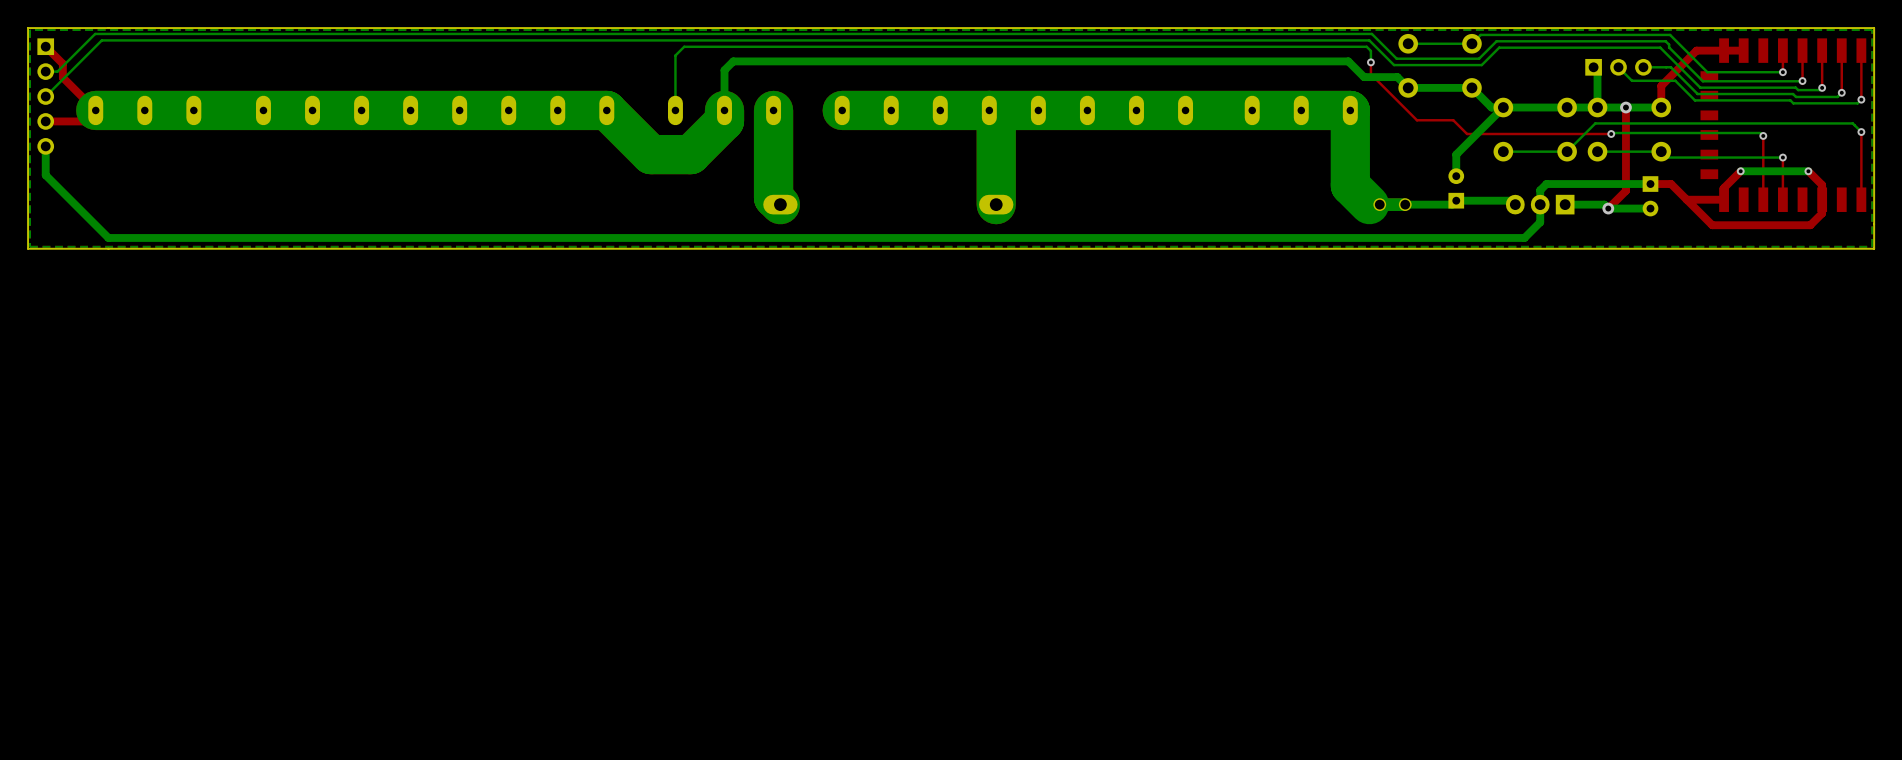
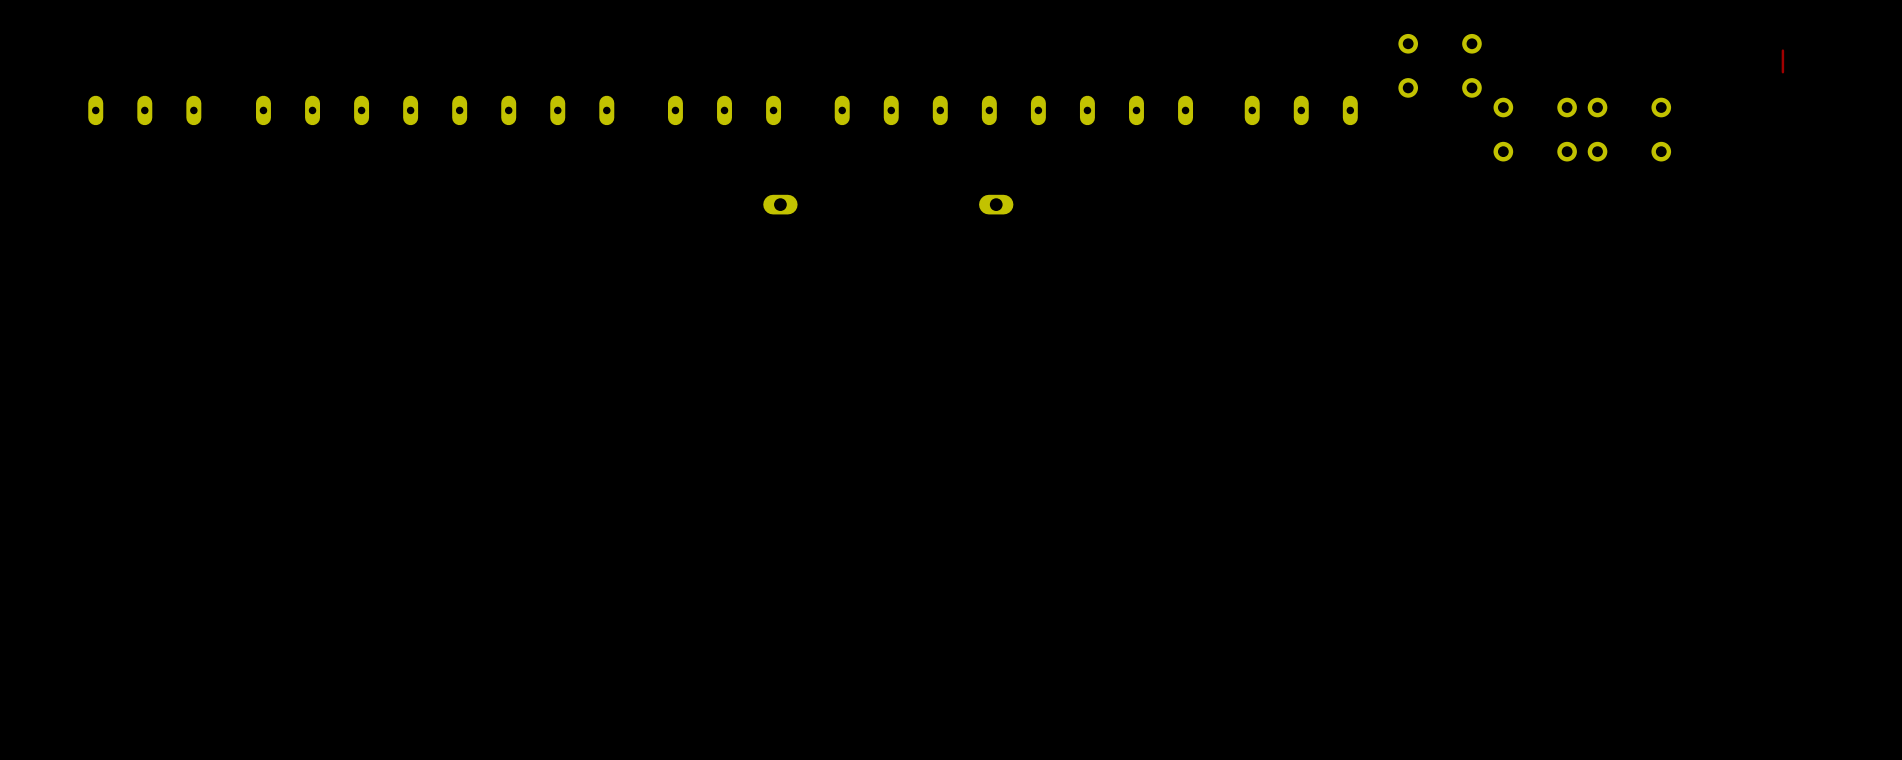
board edge: (1874, 28) (28, 28) (28, 248) (1874, 248) (1874, 28) -> none
bottom zone outline: (1872, 30) (1872, 246) (30, 246) (30, 30) (1872, 30) -> none
bottom track: (1408, 43) (1471, 43) (1480, 34) (1670, 34) (1707, 72) (1782, 72) -> none
top track: (45, 46) (62, 63) (62, 77) (95, 110) -> none
top track: (1743, 50) (1696, 50) (1661, 85) (1661, 107) -> none
top track: (1802, 50) (1802, 83) -> none
top track: (1822, 50) (1822, 87) -> none
top track: (1841, 50) (1841, 92) -> none
top track: (1861, 50) (1861, 99) -> none
top track: (1370, 62) (1370, 74) (1416, 120) (1453, 120) (1467, 134) (1611, 134) -> none
bottom track: (1370, 62) (1370, 51) (1366, 46) (684, 46) (675, 55) (675, 110) -> none
via: (1370, 62) -> none
bottom track: (1593, 67) (1597, 71) (1597, 107) -> none
bottom track: (1618, 67) (1632, 80) (1675, 80) (1694, 100) (1790, 100) (1793, 103) (1857, 103) (1861, 99) -> none
part: (1618, 67) -> none
bottom track: (1643, 67) (1670, 67) (1697, 94) (1793, 94) (1796, 96) (1837, 96) (1841, 92) -> none
bottom track: (45, 71) (57, 71) (95, 33) (1371, 33) (1396, 58) (1479, 58) (1496, 41) (1665, 41) (1669, 47) (1702, 81) (1802, 81) -> none
via: (1782, 72) -> none
via: (1802, 81) -> none
bottom track: (1822, 87) (1819, 90) (1798, 90) (1795, 87) (1700, 87) (1660, 47) (1499, 47) (1481, 65) (1394, 65) (1369, 40) (101, 40) (45, 96) -> none
via: (1822, 87) -> none
via: (1841, 92) -> none
part: (45, 96) -> none
via: (1861, 99) -> none
bottom track: (1503, 107) (1456, 154) (1456, 176) -> none
top track: (1625, 107) (1625, 190) (1608, 208) -> none
via: (1625, 107) -> none
bottom track: (1661, 107) (1491, 107) (1471, 87) (1408, 87) (1397, 77) (1364, 77) (1348, 61) (733, 61) (724, 70) (724, 120) (690, 154) (650, 154) (606, 110) (95, 110) -> none
top track: (95, 110) (84, 121) (45, 121) -> none
bottom track: (773, 110) (773, 197) (780, 204) -> none
bottom track: (842, 110) (1350, 110) (1350, 185) (1369, 204) -> none
bottom track: (989, 110) (996, 117) (996, 204) -> none
part: (1783, 125) -> none
top track: (1861, 132) (1861, 199) -> none
bottom track: (1861, 132) (1852, 123) (1595, 123) (1567, 151) (1503, 151) -> none
via: (1861, 132) -> none
bottom track: (1611, 134) (1760, 133) (1763, 135) -> none
via: (1611, 134) -> none
top track: (1763, 135) (1763, 199) -> none
via: (1763, 135) -> none
bottom track: (45, 146) (45, 175) (108, 237) (1524, 237) (1540, 222) (1540, 190) (1546, 184) (1650, 184) -> none
bottom track: (1597, 151) (1661, 151) (1667, 157) (1782, 157) -> none
top track: (1782, 157) (1782, 199) -> none
via: (1782, 157) -> none
top track: (1740, 171) (1724, 187) (1724, 199) (1686, 199) -> none
via: (1740, 171) -> none
top track: (1808, 171) (1822, 185) (1822, 213) (1810, 225) (1712, 225) (1671, 184) (1650, 184) -> none
bottom track: (1808, 171) (1740, 171) -> none
via: (1808, 171) -> none
part: (1456, 188) -> none
part: (1650, 196) -> none
part: (1392, 204) -> none
bottom track: (1515, 204) (1511, 200) (1456, 200) (1452, 204) (1405, 204) -> none
part: (1540, 204) -> none
via: (1608, 208) -> none
bottom track: (1650, 208) (1608, 208) (1604, 204) (1565, 204) (1569, 208) -> none

